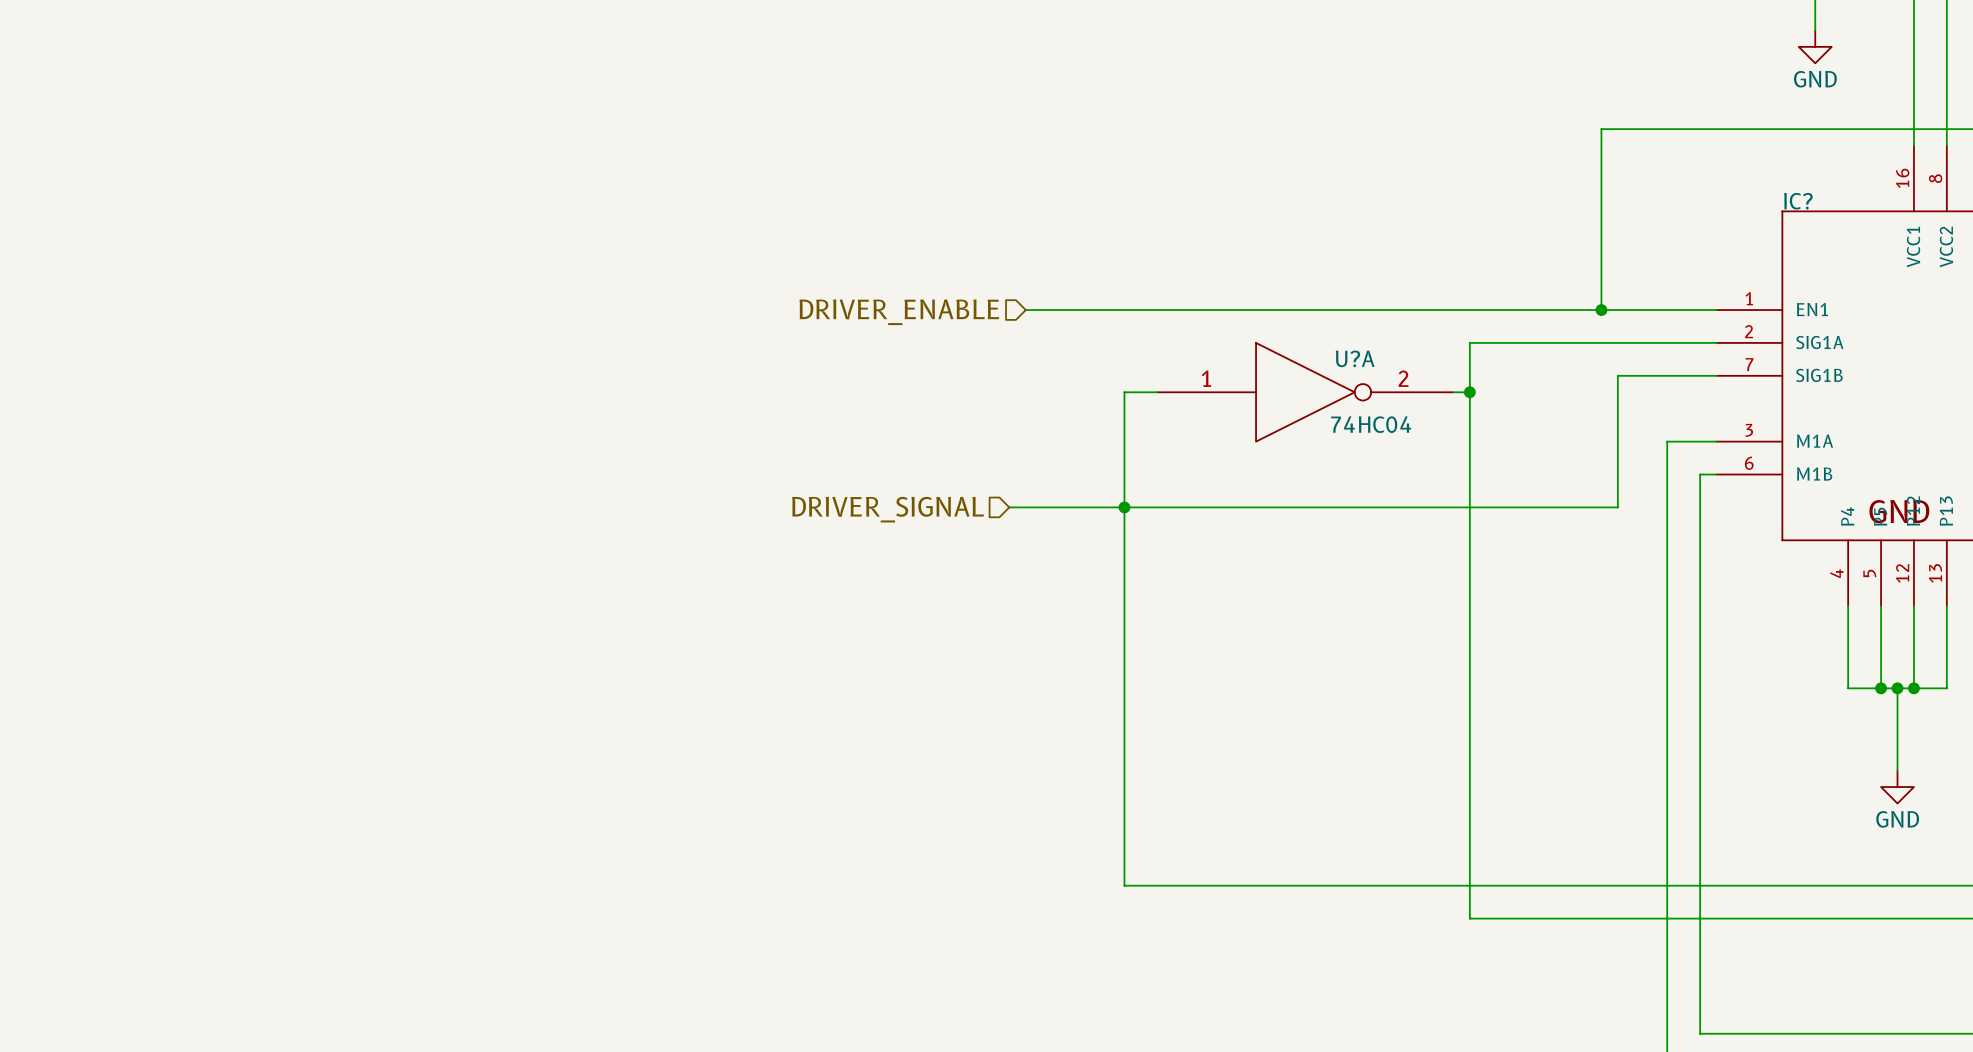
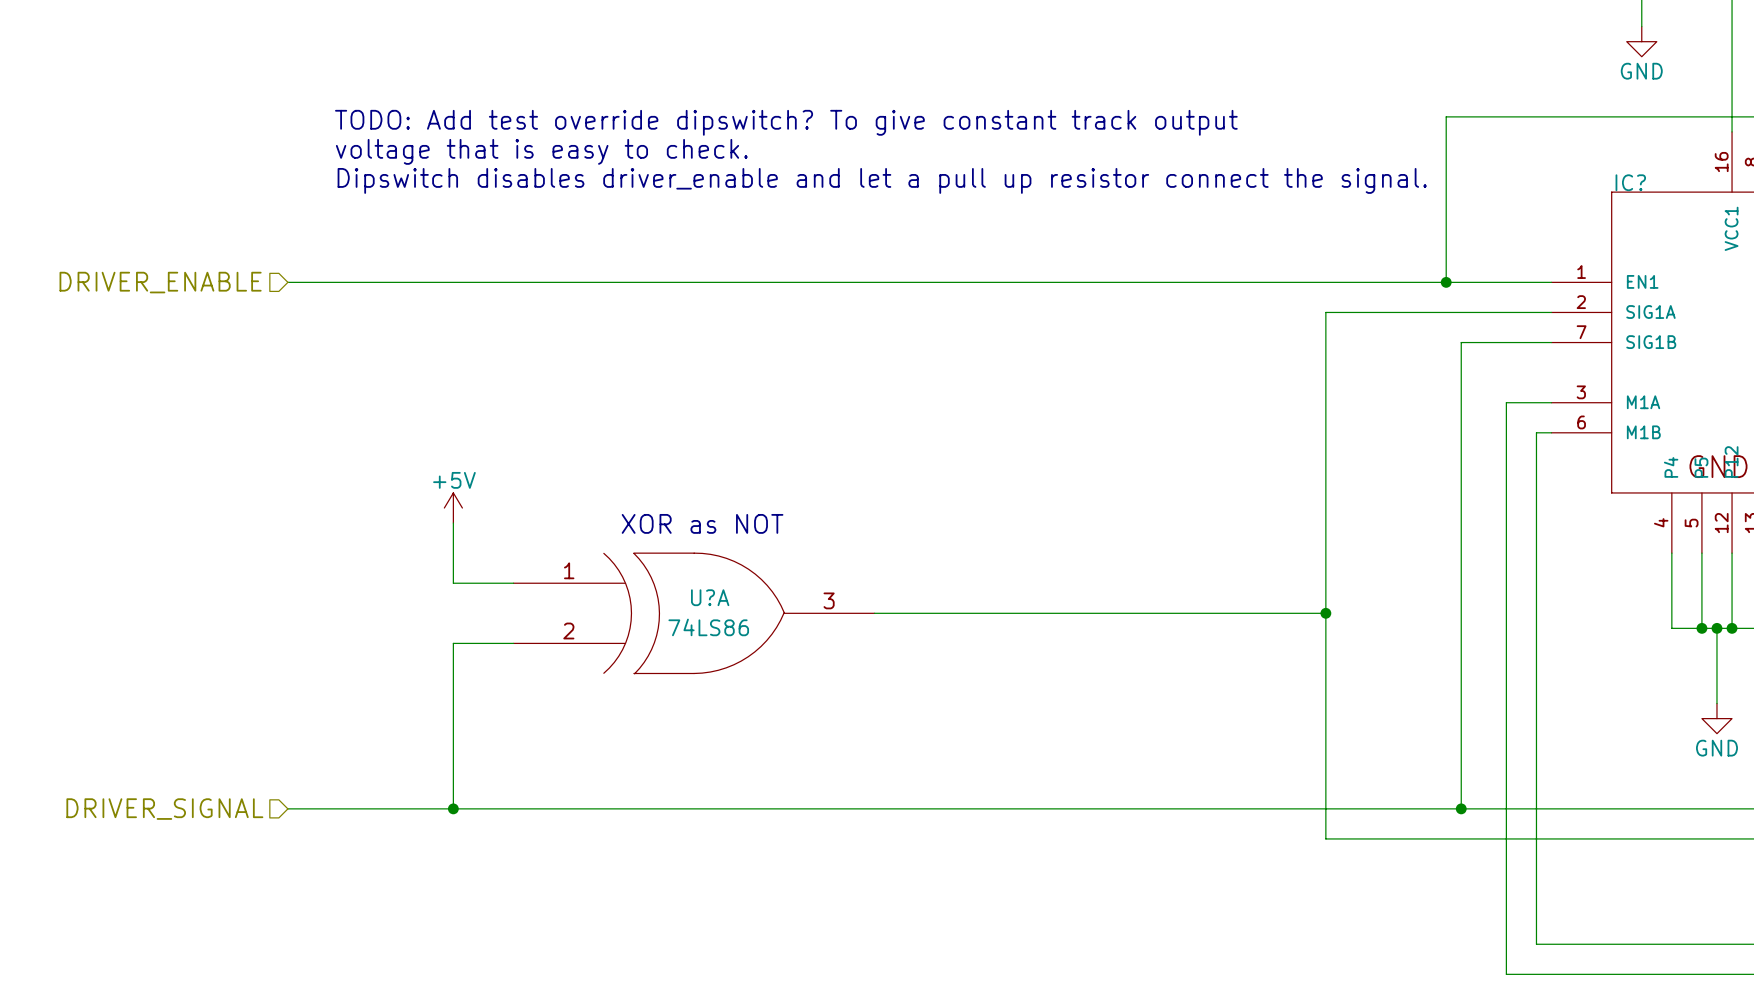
text: none -> TODO: Add test override dipswitch? To give constant track output (786, 122)
text: none -> voltage that is easy to check. (541, 151)
text: none -> Dipswitch disables driver_enable and let a pull up resistor connect the signal. (882, 180)
wire: none -> (287, 282) (919, 282)
hierarchical label: none -> DRIVER_ENABLE (160, 282)
hierarchical label: DRIVER_ENABLE (899, 312) -> none
wire: (1157, 392) (1124, 392) (1124, 885) -> (287, 808) (1009, 808)
U?A: 74HC04 (1305, 392) -> none
wire: (1453, 392) (1469, 392) -> none
junction: (1469, 392) -> none
wire: (1009, 507) (1617, 507) -> (1461, 808) (1461, 462)
junction: (1124, 507) -> none
hierarchical label: DRIVER_SIGNAL (887, 509) -> none
power symbol: none -> +5V (453, 508)
wire: none -> (453, 523) (453, 583) (513, 583)
text: none -> XOR as NOT (702, 523)
wire: none -> (874, 613) (1325, 613)
junction: none -> (1325, 613)
U?A: none -> 74LS86 (694, 613)
wire: none -> (513, 643) (453, 643) (453, 808)
junction: none -> (453, 808)
junction: none -> (1461, 808)
hierarchical label: none -> DRIVER_SIGNAL (164, 809)

